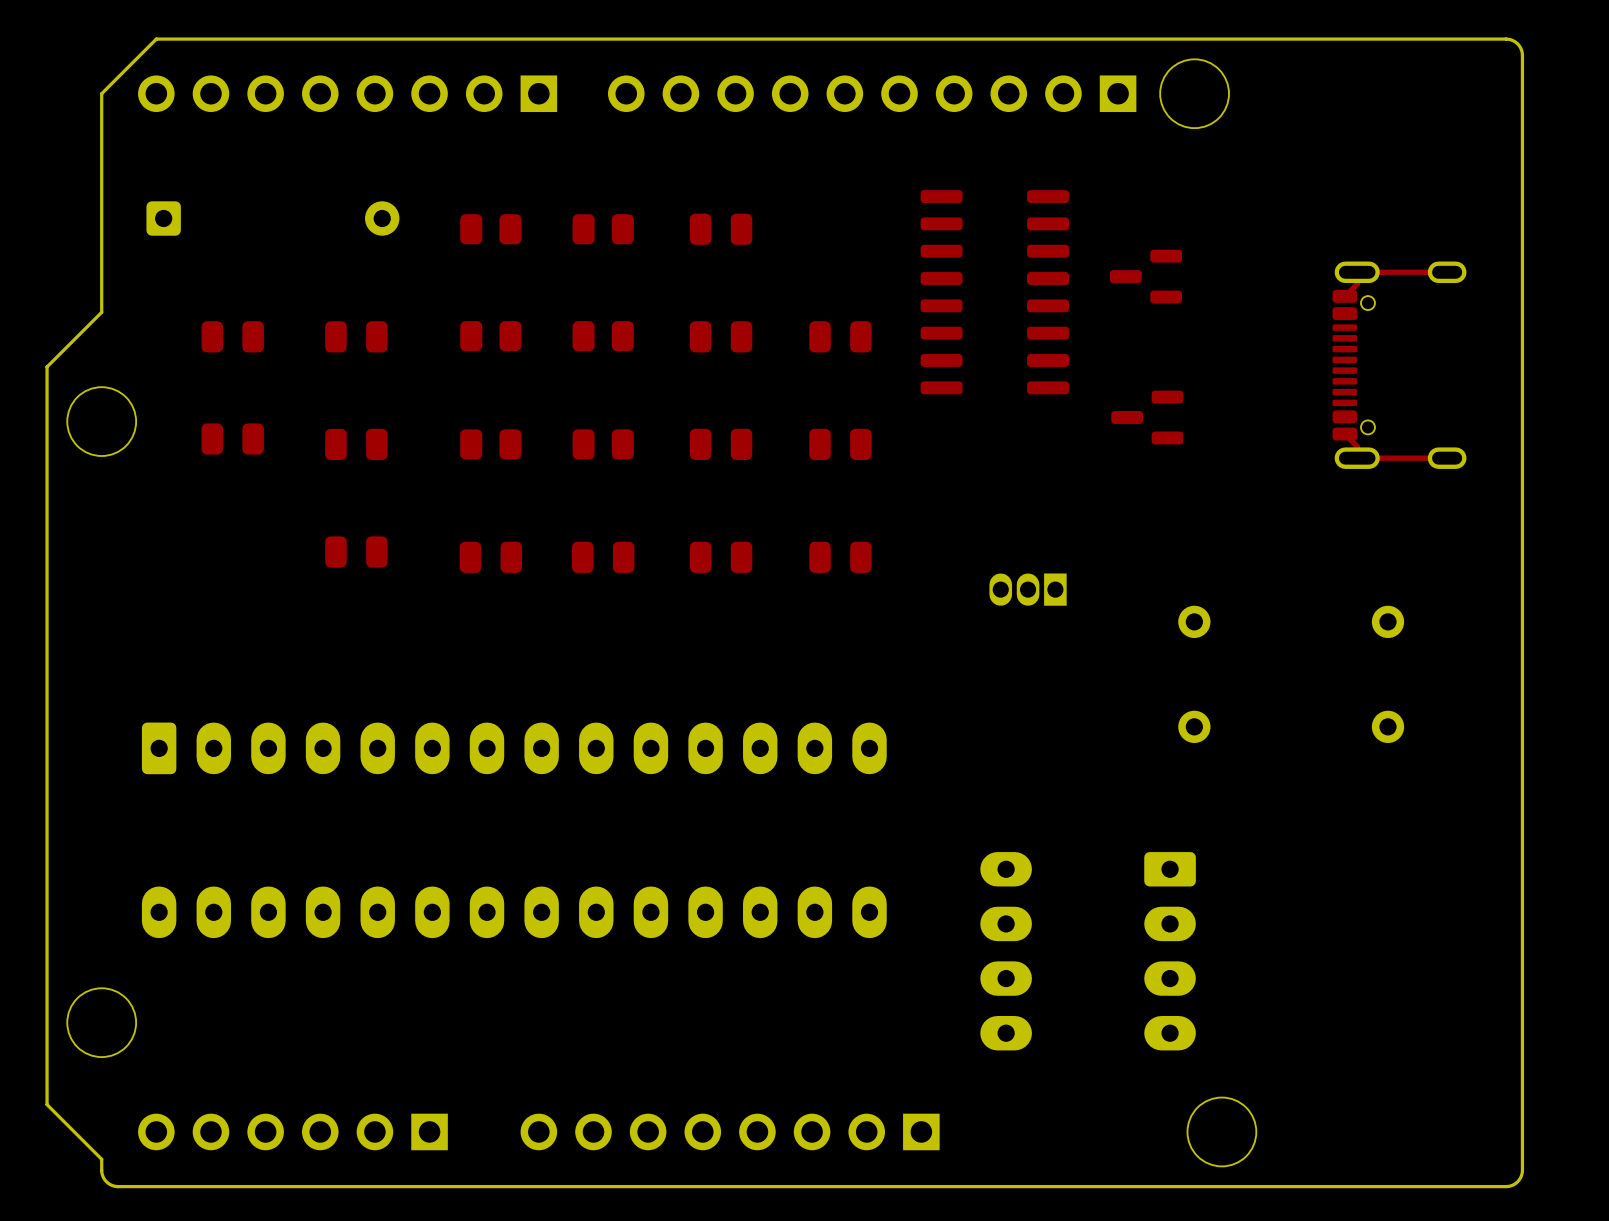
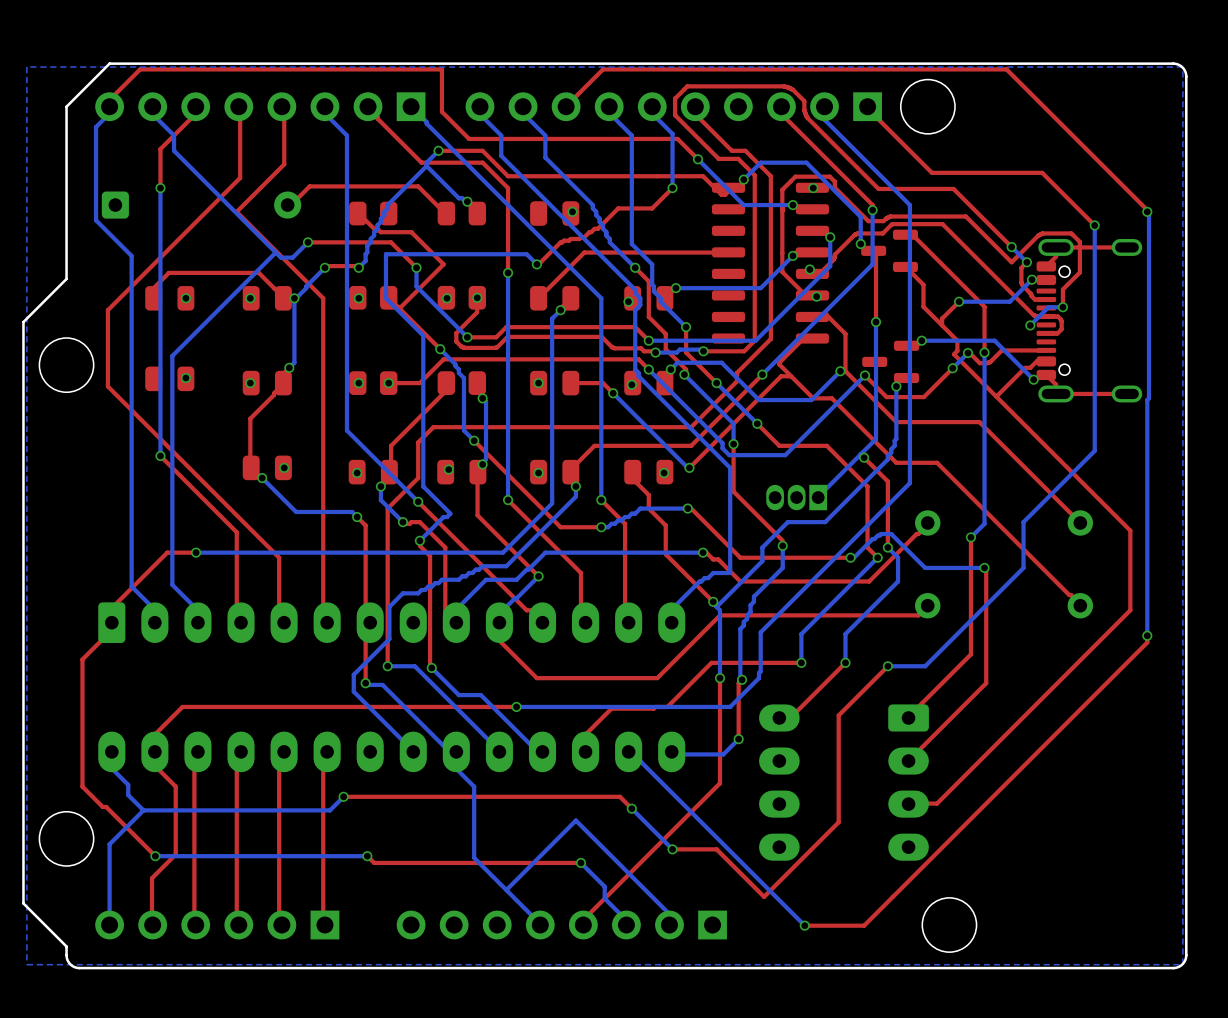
bottom zone outline: none -> (1182, 67) (26, 67) (26, 964) (1182, 964) (1182, 67)
top track: none -> (109, 99) (140, 69) (441, 69) (441, 111) (469, 138) (677, 138) (697, 159)
top track: none -> (367, 106) (421, 162) (482, 162) (508, 188) (508, 271)
bottom track: none -> (411, 106) (601, 298) (601, 500)
top track: none -> (565, 106) (603, 69) (1006, 69) (1147, 210)
bottom track: none -> (825, 106) (825, 120) (909, 205) (909, 483) (760, 632) (759, 678) (730, 706) (516, 706)
top track: none -> (867, 108) (931, 172) (1042, 172) (1094, 225)
top track: none -> (197, 111) (160, 149) (160, 186)
top track: none -> (240, 111) (240, 177) (107, 310) (107, 386) (279, 557) (279, 622)
top track: none -> (284, 111) (284, 164) (236, 211) (323, 298) (323, 622)
top track: none -> (692, 111) (731, 150) (745, 150) (770, 176) (770, 339) (736, 372) (736, 381) (691, 427) (433, 427) (418, 442) (418, 478) (387, 508) (387, 666)
top track: none -> (779, 111) (872, 205) (872, 210)
bottom track: none -> (109, 113) (96, 127) (96, 220) (131, 255) (131, 586) (150, 605) (150, 622)
bottom track: none -> (151, 113) (174, 135) (174, 150) (280, 257) (292, 257) (306, 244)
bottom track: none -> (324, 113) (346, 135) (346, 430) (418, 501)
bottom track: none -> (479, 113) (501, 135) (501, 155) (635, 289) (635, 293) (640, 298) (640, 305) (635, 310) (635, 369) (638, 372) (638, 376) (730, 467) (730, 573) (713, 573) (708, 578) (704, 578) (667, 613)
bottom track: none -> (523, 113) (545, 135) (545, 157) (592, 205) (609, 242) (635, 267)
bottom track: none -> (609, 113) (631, 135) (631, 244) (652, 264) (653, 291) (660, 298) (660, 301) (686, 327)
bottom track: none -> (652, 113) (672, 133) (672, 188)
top track: none -> (438, 150) (482, 150) (508, 176) (703, 176) (721, 194) (725, 194) (728, 191) (728, 187)
bottom track: none -> (438, 150) (426, 162) (426, 166)
via: none -> (438, 150)
bottom track: none -> (697, 159) (743, 205) (792, 205)
via: none -> (697, 159)
bottom track: none -> (426, 166) (458, 198) (462, 198) (465, 201)
bottom track: none -> (426, 166) (387, 205) (370, 242) (367, 245) (365, 261) (358, 267)
bottom track: none -> (743, 179) (760, 162) (806, 162) (860, 216) (860, 244)
via: none -> (743, 179)
bottom track: none -> (160, 188) (160, 456)
via: none -> (160, 188)
top track: none -> (672, 188) (652, 208) (618, 208) (597, 228) (594, 228) (584, 237) (560, 242) (538, 264)
via: none -> (672, 188)
via: none -> (813, 188)
via: none -> (467, 201)
top track: none -> (291, 205) (309, 186) (418, 186) (447, 213)
via: none -> (792, 205)
bottom track: none -> (872, 210) (872, 264) (762, 374)
via: none -> (872, 210)
via: none -> (572, 211)
bottom track: none -> (1147, 211) (1148, 213) (1147, 635)
via: none -> (1147, 211)
top track: none -> (357, 213) (375, 230) (411, 232) (443, 264) (399, 308)
bottom track: none -> (1094, 225) (1094, 450) (1023, 522) (1023, 567) (925, 666) (887, 666)
via: none -> (1094, 225)
top track: none -> (905, 234) (913, 235) (984, 306) (984, 352)
bottom track: none -> (830, 237) (830, 266) (755, 340) (648, 340)
via: none -> (830, 237)
top track: none -> (307, 242) (391, 242) (416, 267)
via: none -> (307, 242)
via: none -> (860, 244)
top track: none -> (1011, 247) (953, 188) (878, 188) (807, 117) (804, 110) (804, 101) (789, 88) (784, 86) (687, 86) (675, 98) (675, 115) (718, 158) (738, 158) (754, 175) (754, 340) (744, 351) (703, 351)
bottom track: none -> (1011, 247) (1026, 262)
via: none -> (1011, 247)
top track: none -> (873, 250) (876, 252) (876, 320)
bottom track: none -> (275, 252) (172, 355) (172, 584) (194, 606) (194, 622)
top track: none -> (728, 252) (584, 252) (538, 298)
bottom track: none -> (792, 255) (760, 288) (675, 288)
via: none -> (792, 255)
top track: none -> (1026, 262) (1021, 267) (1022, 285) (1034, 299) (1046, 299)
via: none -> (1026, 262)
bottom track: none -> (536, 264) (526, 254) (385, 254) (385, 298) (423, 335) (423, 486) (450, 513) (447, 517) (443, 517) (419, 540)
via: none -> (536, 264)
top track: none -> (326, 266) (357, 266) (358, 267)
top track: none -> (905, 266) (923, 284) (923, 306) (957, 340) (957, 350) (954, 354) (1130, 530) (1130, 610) (937, 803) (908, 803)
bottom track: none -> (324, 267) (296, 298)
via: none -> (324, 267)
via: none -> (358, 267)
bottom track: none -> (416, 267) (416, 286) (467, 337)
via: none -> (416, 267)
top track: none -> (635, 267) (648, 281) (648, 316) (665, 333) (665, 349) (686, 369) (686, 372)
via: none -> (635, 267)
via: none -> (809, 269)
bottom track: none -> (508, 272) (508, 500)
via: none -> (508, 272)
top track: none -> (812, 273) (819, 273) (833, 260) (834, 254) (856, 233) (882, 233) (892, 224) (942, 224) (1033, 315) (1057, 316) (1060, 319) (1061, 329) (1057, 333) (1046, 333)
bottom track: none -> (1032, 279) (1009, 301) (959, 301)
via: none -> (1032, 279)
via: none -> (675, 288)
top track: none -> (812, 295) (805, 295) (782, 272) (782, 189) (795, 176) (829, 176) (834, 181) (834, 187) (868, 221) (883, 221) (890, 216) (965, 216) (1011, 262) (1040, 234) (1071, 233) (1079, 241) (1079, 272) (1062, 289) (1062, 307)
via: none -> (816, 296)
via: none -> (185, 298)
via: none -> (250, 298)
top track: none -> (284, 298) (258, 272) (168, 272) (153, 288) (153, 298)
bottom track: none -> (294, 298) (294, 362) (289, 367)
via: none -> (294, 298)
via: none -> (358, 298)
top track: none -> (388, 297) (440, 349)
via: none -> (447, 298)
top track: none -> (477, 297) (477, 312) (456, 333) (456, 341) (464, 347) (496, 347) (507, 336) (601, 336) (614, 348) (641, 348) (644, 351) (650, 351)
via: none -> (477, 297)
via: none -> (628, 301)
top track: none -> (959, 301) (942, 318) (942, 325)
via: none -> (959, 301)
bottom track: none -> (1062, 307) (1048, 307) (1030, 325)
via: none -> (1062, 307)
bottom track: none -> (560, 310) (552, 318) (552, 503) (502, 552) (196, 552)
via: none -> (560, 310)
top track: none -> (812, 316) (828, 316) (845, 333) (845, 371) (896, 422) (979, 422) (1081, 523)
bottom track: none -> (876, 322) (876, 439) (818, 496)
via: none -> (876, 322)
via: none -> (1030, 325)
top track: none -> (686, 327) (686, 352) (716, 383)
via: none -> (686, 327)
top track: none -> (467, 337) (496, 337) (506, 327) (635, 327) (648, 340)
via: none -> (467, 337)
top track: none -> (812, 338) (803, 339) (779, 364) (813, 398) (831, 398) (896, 462) (937, 462) (1081, 605)
via: none -> (648, 340)
bottom track: none -> (921, 340) (994, 340) (1033, 379)
via: none -> (921, 340)
bottom track: none -> (440, 349) (455, 364) (458, 372) (463, 378) (463, 430) (474, 440)
via: none -> (440, 349)
bottom track: none -> (701, 349) (655, 352)
top track: none -> (1046, 350) (1001, 350) (987, 363) (979, 363) (969, 352)
via: none -> (703, 351)
via: none -> (655, 352)
bottom track: none -> (984, 352) (984, 523) (970, 537)
via: none -> (984, 352)
bottom track: none -> (967, 353) (952, 368)
via: none -> (967, 353)
top track: none -> (1046, 361) (1037, 361) (1030, 367) (1025, 367) (996, 396)
via: none -> (289, 367)
top track: none -> (952, 368) (923, 397) (886, 397) (864, 375)
via: none -> (952, 368)
top track: none -> (648, 369) (638, 359) (443, 359) (419, 383) (388, 383)
bottom track: none -> (648, 369) (722, 443) (722, 448) (729, 455) (785, 455) (864, 375)
via: none -> (648, 369)
bottom track: none -> (670, 369) (677, 362) (721, 362) (759, 400) (811, 400) (840, 371)
via: none -> (670, 369)
via: none -> (840, 371)
bottom track: none -> (684, 374) (733, 423) (733, 444)
via: none -> (684, 374)
top track: none -> (762, 374) (691, 445) (594, 445) (570, 469) (570, 472) (567, 476) (575, 486)
via: none -> (762, 374)
via: none -> (864, 375)
top track: none -> (791, 376) (781, 376) (689, 467)
via: none -> (185, 378)
via: none -> (1033, 379)
via: none -> (250, 383)
top track: none -> (284, 383) (250, 418) (250, 467)
via: none -> (358, 383)
via: none -> (388, 383)
top track: none -> (446, 383) (447, 389) (391, 445) (391, 471) (389, 472)
via: none -> (538, 383)
top track: none -> (570, 383) (603, 383) (613, 393)
bottom track: none -> (716, 383) (757, 423)
via: none -> (716, 383)
via: none -> (631, 384)
bottom track: none -> (896, 386) (896, 439) (887, 459) (825, 522) (787, 522) (762, 547) (762, 561) (716, 606)
via: none -> (896, 386)
bottom track: none -> (613, 393) (687, 466)
via: none -> (613, 393)
bottom track: none -> (482, 398) (486, 401) (486, 459) (482, 462)
via: none -> (482, 398)
top track: none -> (757, 423) (779, 445) (826, 445) (867, 486) (867, 547) (877, 557)
via: none -> (757, 423)
top track: none -> (474, 440) (560, 527) (599, 527)
via: none -> (474, 440)
top track: none -> (733, 444) (733, 491) (782, 540)
via: none -> (733, 444)
top track: none -> (160, 456) (236, 532) (236, 622)
via: none -> (160, 456)
top track: none -> (864, 457) (887, 481) (887, 547)
via: none -> (864, 457)
top track: none -> (482, 464) (477, 469) (477, 515) (536, 574)
via: none -> (482, 464)
via: none -> (284, 467)
via: none -> (689, 467)
via: none -> (448, 469)
top track: none -> (632, 472) (631, 478) (648, 495) (648, 508) (665, 525) (665, 554) (713, 601)
via: none -> (357, 472)
via: none -> (538, 472)
via: none -> (664, 472)
bottom track: none -> (262, 478) (296, 511) (352, 511) (357, 517)
via: none -> (262, 478)
bottom track: none -> (380, 486) (380, 500) (402, 522)
via: none -> (380, 486)
bottom track: none -> (575, 486) (575, 496) (506, 566) (482, 566) (458, 579) (441, 579) (418, 593) (402, 593) (389, 606) (389, 639) (353, 674) (353, 691) (409, 747)
via: none -> (575, 486)
top track: none -> (508, 500) (580, 573) (580, 622)
via: none -> (508, 500)
top track: none -> (601, 500) (625, 523) (625, 622)
via: none -> (601, 500)
top track: none -> (418, 501) (526, 610) (538, 610) (538, 622)
via: none -> (418, 501)
top track: none -> (689, 506) (740, 557) (850, 557)
bottom track: none -> (687, 508) (640, 508) (635, 513) (618, 520) (608, 527) (601, 527)
via: none -> (687, 508)
top track: none -> (357, 517) (365, 525) (365, 622)
via: none -> (357, 517)
via: none -> (402, 522)
top track: none -> (404, 523) (419, 522) (445, 547) (445, 615)
top track: none -> (928, 523) (869, 581) (740, 581) (718, 559) (713, 559) (706, 552) (703, 552)
via: none -> (601, 527)
top track: none -> (970, 537) (970, 654) (908, 717)
via: none -> (970, 537)
via: none -> (419, 540)
top track: none -> (419, 545) (430, 556) (430, 666)
bottom track: none -> (782, 545) (782, 567) (753, 596) (750, 612) (740, 628) (740, 678)
via: none -> (782, 545)
bottom track: none -> (887, 547) (898, 557) (898, 581) (845, 634) (845, 662)
via: none -> (887, 547)
top track: none -> (196, 552) (167, 552) (107, 612) (107, 634) (82, 659) (82, 786) (102, 806) (106, 806) (155, 856)
via: none -> (196, 552)
bottom track: none -> (703, 552) (545, 552) (516, 579) (486, 579) (452, 613)
via: none -> (703, 552)
bottom track: none -> (850, 557) (853, 557) (877, 535) (891, 534) (925, 567) (984, 567)
via: none -> (850, 557)
bottom track: none -> (877, 557) (801, 634) (801, 662)
via: none -> (877, 557)
via: none -> (984, 567)
top track: none -> (986, 567) (986, 683) (911, 757)
bottom track: none -> (538, 576) (494, 618)
via: none -> (538, 576)
via: none -> (713, 601)
bottom track: none -> (713, 603) (720, 610) (720, 678)
top track: none -> (928, 605) (918, 615) (720, 615) (657, 678) (536, 678) (494, 635) (494, 622)
top track: none -> (372, 628) (365, 637) (365, 683)
top track: none -> (1147, 635) (1147, 642) (864, 925) (804, 925)
via: none -> (1147, 635)
top track: none -> (801, 662) (711, 662) (667, 706) (611, 708) (580, 739) (580, 751)
via: none -> (801, 662)
via: none -> (845, 662)
top track: none -> (843, 664) (791, 717) (779, 717)
bottom track: none -> (387, 666) (414, 666) (494, 745)
via: none -> (387, 666)
top track: none -> (887, 666) (838, 715) (838, 822) (764, 896) (716, 849) (672, 849)
via: none -> (887, 666)
bottom track: none -> (431, 667) (458, 695) (480, 695) (536, 751)
via: none -> (431, 667)
top track: none -> (720, 678) (720, 783) (582, 920)
via: none -> (720, 678)
top track: none -> (742, 679) (738, 683) (738, 739)
via: none -> (742, 679)
via: none -> (365, 683)
bottom track: none -> (363, 684) (382, 684) (448, 751)
top track: none -> (516, 706) (182, 706) (150, 739) (150, 751)
via: none -> (516, 706)
bottom track: none -> (738, 739) (723, 754) (667, 754)
via: none -> (738, 739)
bottom track: none -> (107, 751) (107, 764) (128, 784) (128, 795) (143, 810)
top track: none -> (194, 751) (194, 918)
top track: none -> (236, 751) (236, 923)
top track: none -> (279, 751) (279, 922)
top track: none -> (323, 751) (323, 923) (324, 925)
bottom track: none -> (452, 751) (452, 764) (474, 786) (474, 857) (540, 923)
top track: none -> (151, 752) (151, 762) (175, 786) (175, 854) (151, 878) (151, 918)
bottom track: none -> (625, 761) (640, 761) (804, 925)
bottom track: none -> (343, 796) (330, 810) (143, 810)
via: none -> (343, 796)
top track: none -> (345, 796) (619, 796) (631, 808)
bottom track: none -> (631, 808) (672, 849)
via: none -> (631, 808)
bottom track: none -> (143, 810) (109, 844) (109, 920)
via: none -> (672, 849)
via: none -> (155, 856)
top track: none -> (367, 856) (374, 862) (580, 862)
bottom track: none -> (367, 856) (155, 856)
via: none -> (367, 856)
bottom track: none -> (580, 862) (604, 886) (604, 898) (626, 920)
via: none -> (580, 862)
bottom track: none -> (506, 890) (575, 820) (669, 913) (669, 925)
via: none -> (804, 925)

